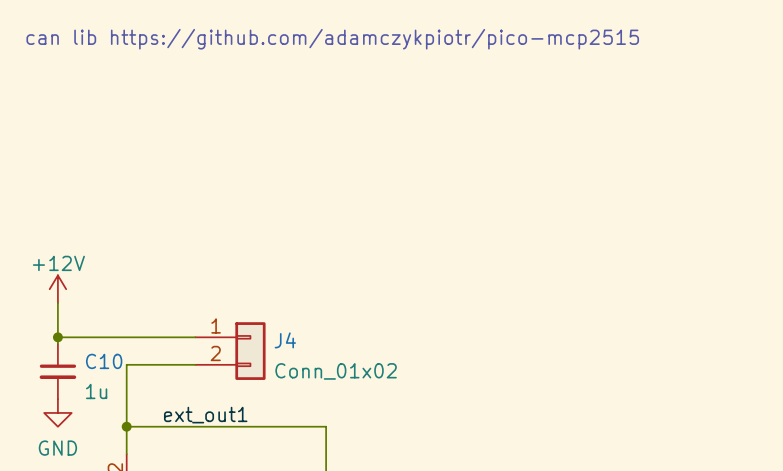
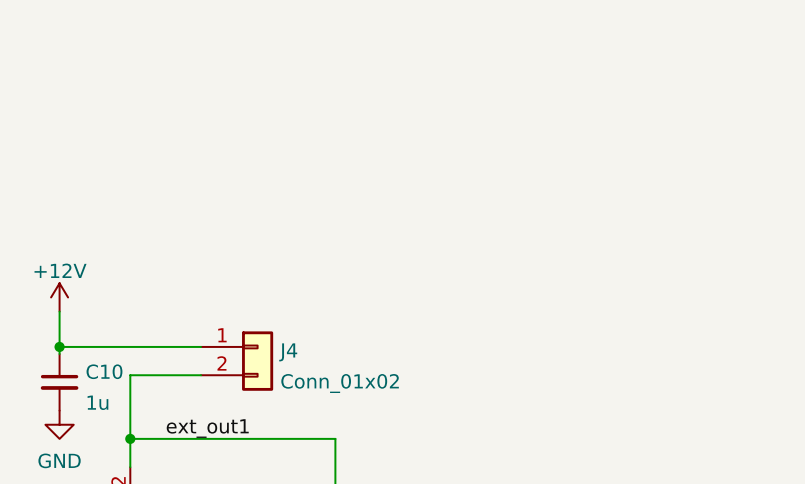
text: can lib https://github.com/adamczykpiotr/pico-mcp2515 (332, 39) -> none

